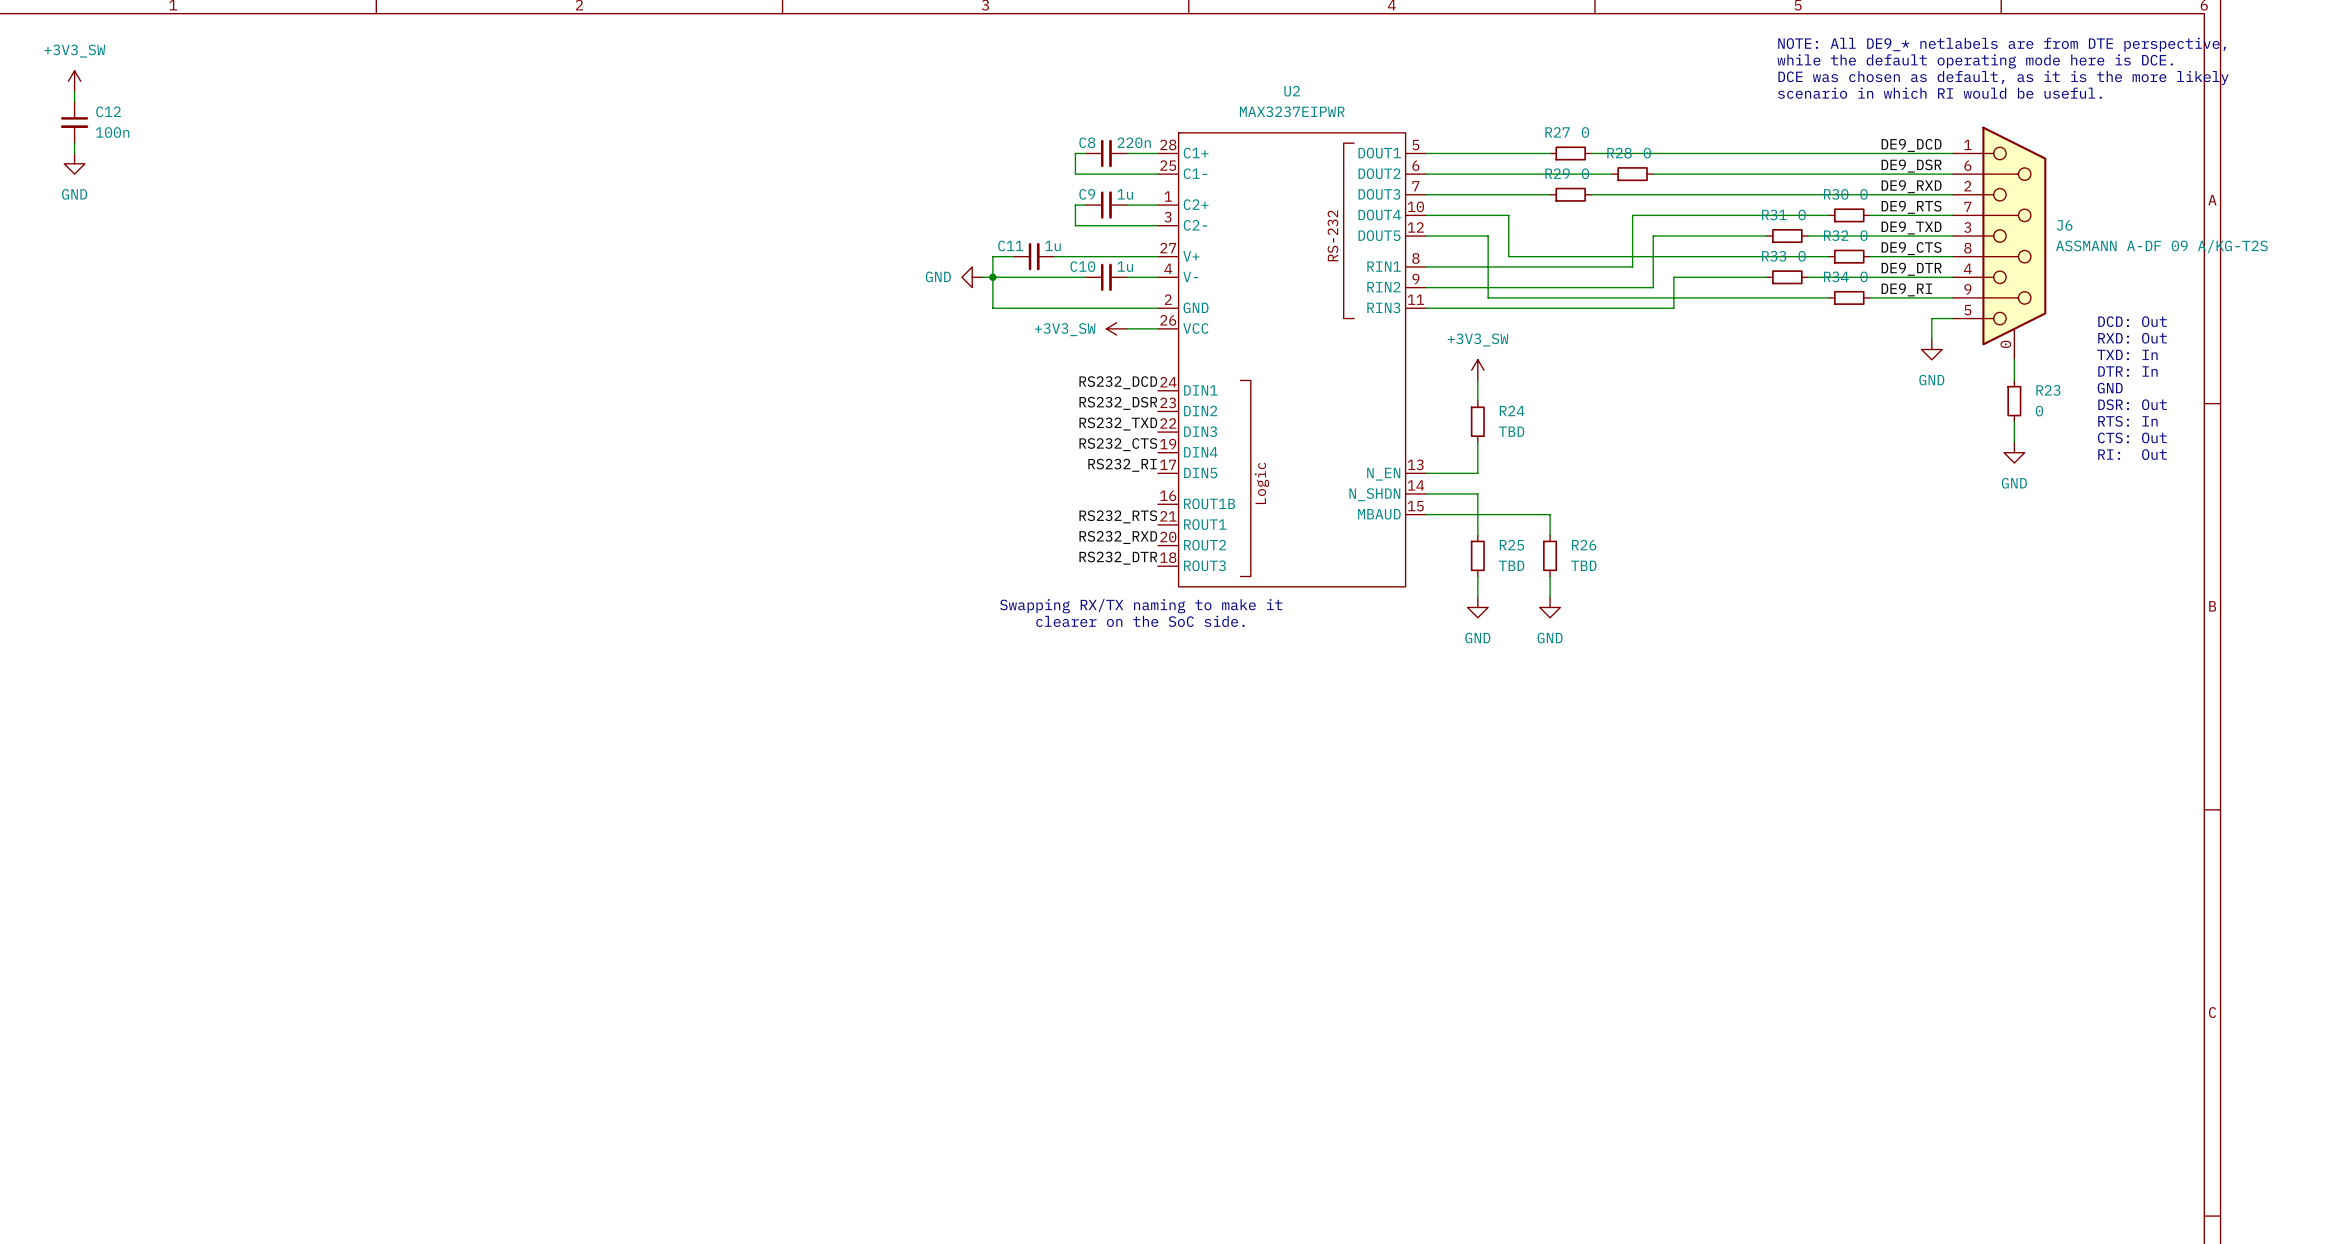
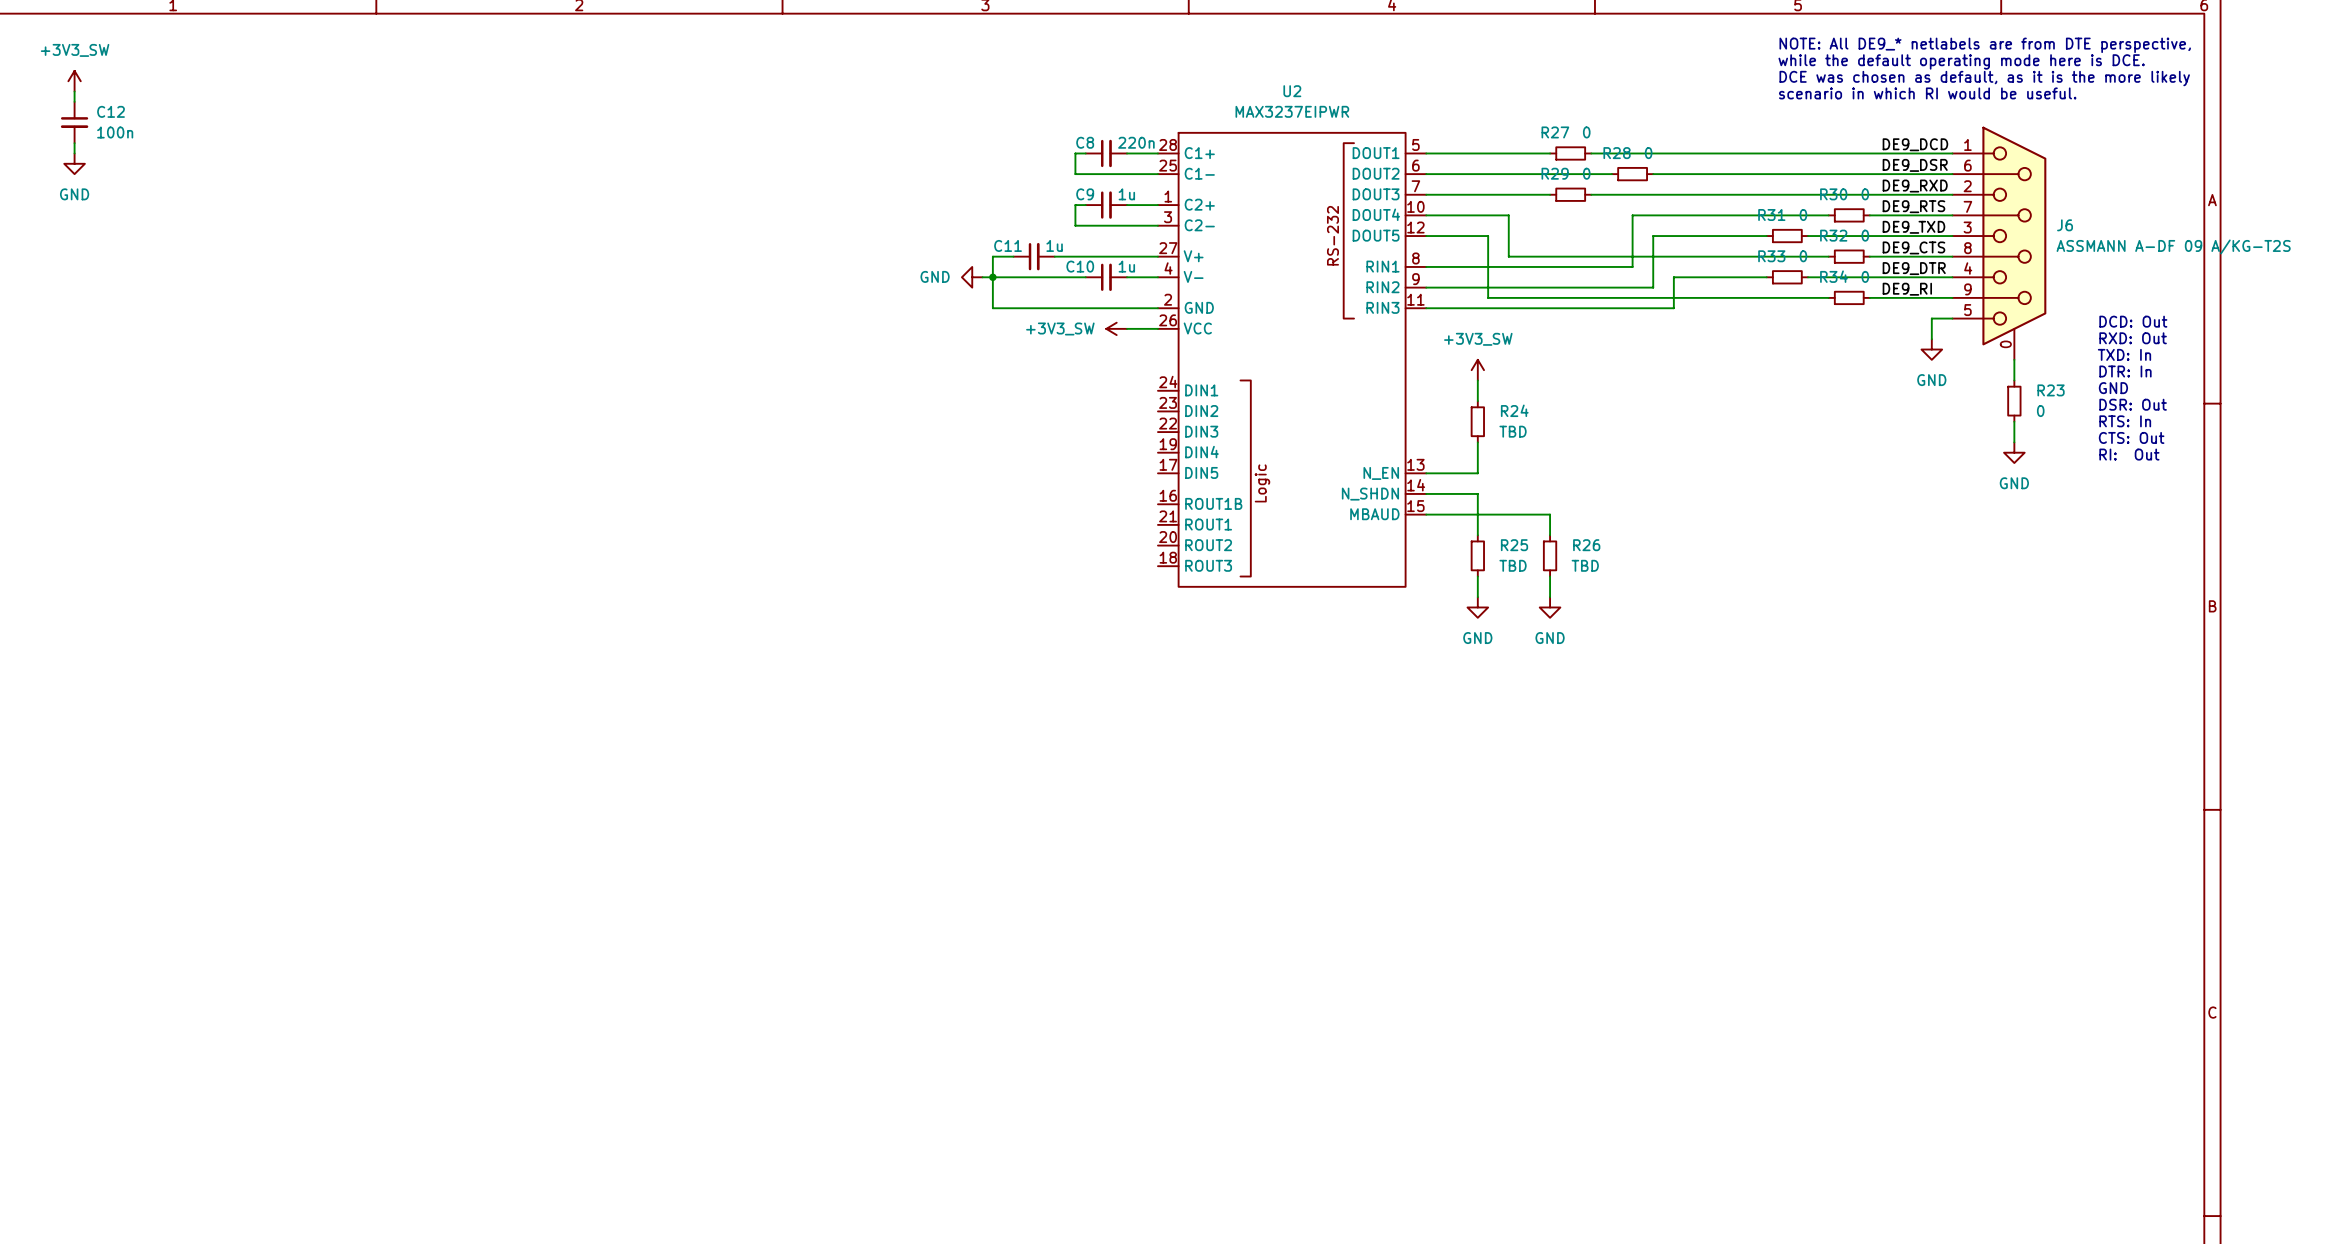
label: RS232_DCD (1118, 382) -> none
label: RS232_DSR (1118, 403) -> none
label: RS232_TXD (1118, 424) -> none
label: RS232_CTS (1118, 444) -> none
label: RS232_RI (1122, 465) -> none
label: RS232_RTS (1118, 516) -> none
label: RS232_RXD (1118, 537) -> none
label: RS232_DTR (1118, 558) -> none
text: Swapping RX/TX naming to make it (1141, 606) -> none
text: clearer on the SoC side. (1140, 621) -> none

